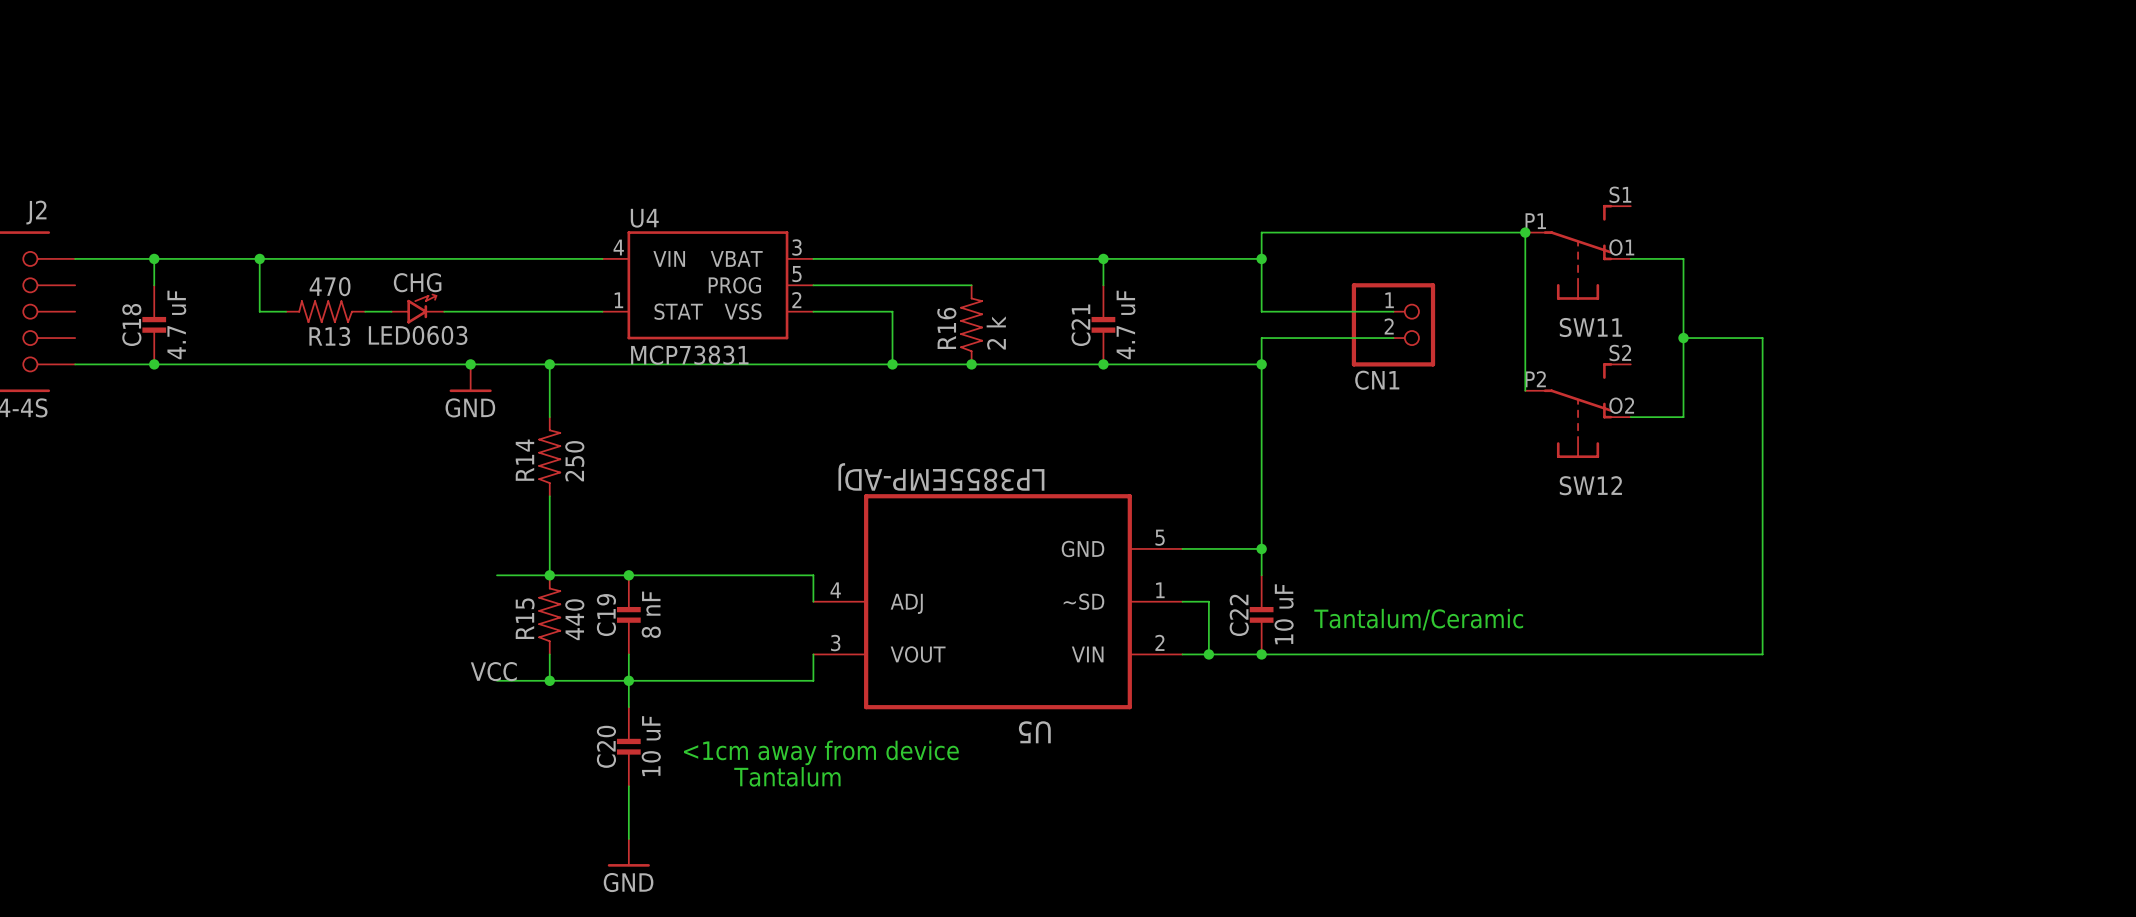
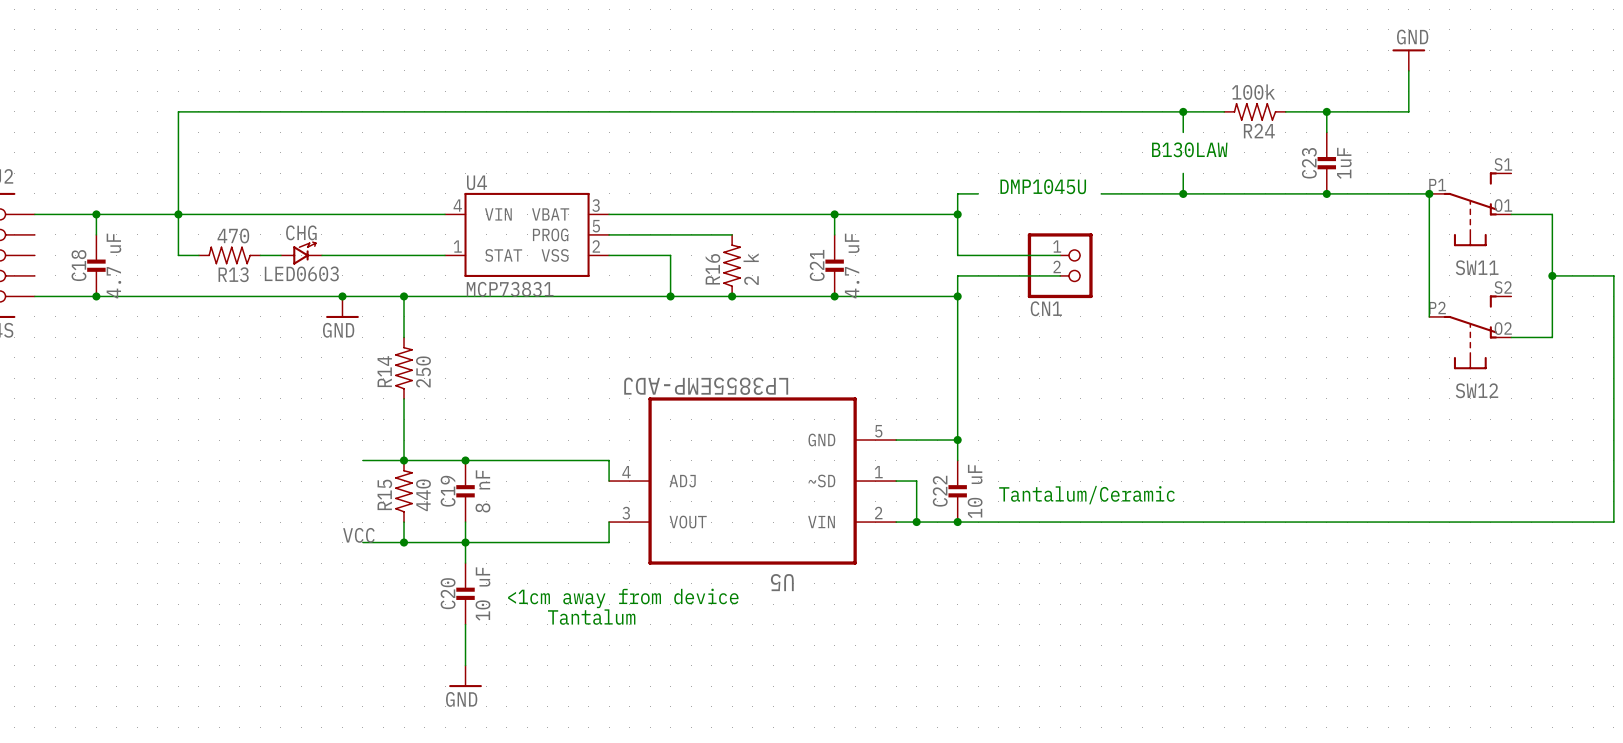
power symbol: none -> GND (1408, 60)
wire: none -> (1408, 70) (1408, 111) (1285, 111)
wire: none -> (1183, 111) (1183, 132)
junction: none -> (1183, 111)
wire: none -> (1224, 111) (178, 111) (178, 214)
R24: none -> 100k (1255, 111)
wire: none -> (1326, 111) (1326, 132)
junction: none -> (1326, 111)
text: none -> B130LAW (1189, 149)
C23: none -> 1uF (1326, 163)
wire: none -> (1183, 173) (1183, 193)
text: none -> DMP1045U (1043, 186)
wire: (1288, 232) (1446, 232) -> none
wire: (1525, 232) (1525, 390) -> (1162, 193) (1429, 193) (1429, 316)
junction position: (1525, 232) -> (1183, 193)
junction: none -> (1326, 193)
junction: none -> (1429, 193)
SW11 position: (1578, 252) -> (1470, 209)
wire: (1630, 258) (1683, 258) (1683, 417) (1630, 417) -> none
wire: none -> (1511, 214) (1552, 214) (1552, 337) (1511, 337)
wire: (1683, 338) (1762, 338) (1762, 654) -> (1552, 275) (1613, 275) (1613, 522) (1347, 522)
junction: (1683, 338) -> none
junction: none -> (1552, 275)
SW12 position: (1578, 410) -> (1470, 332)

